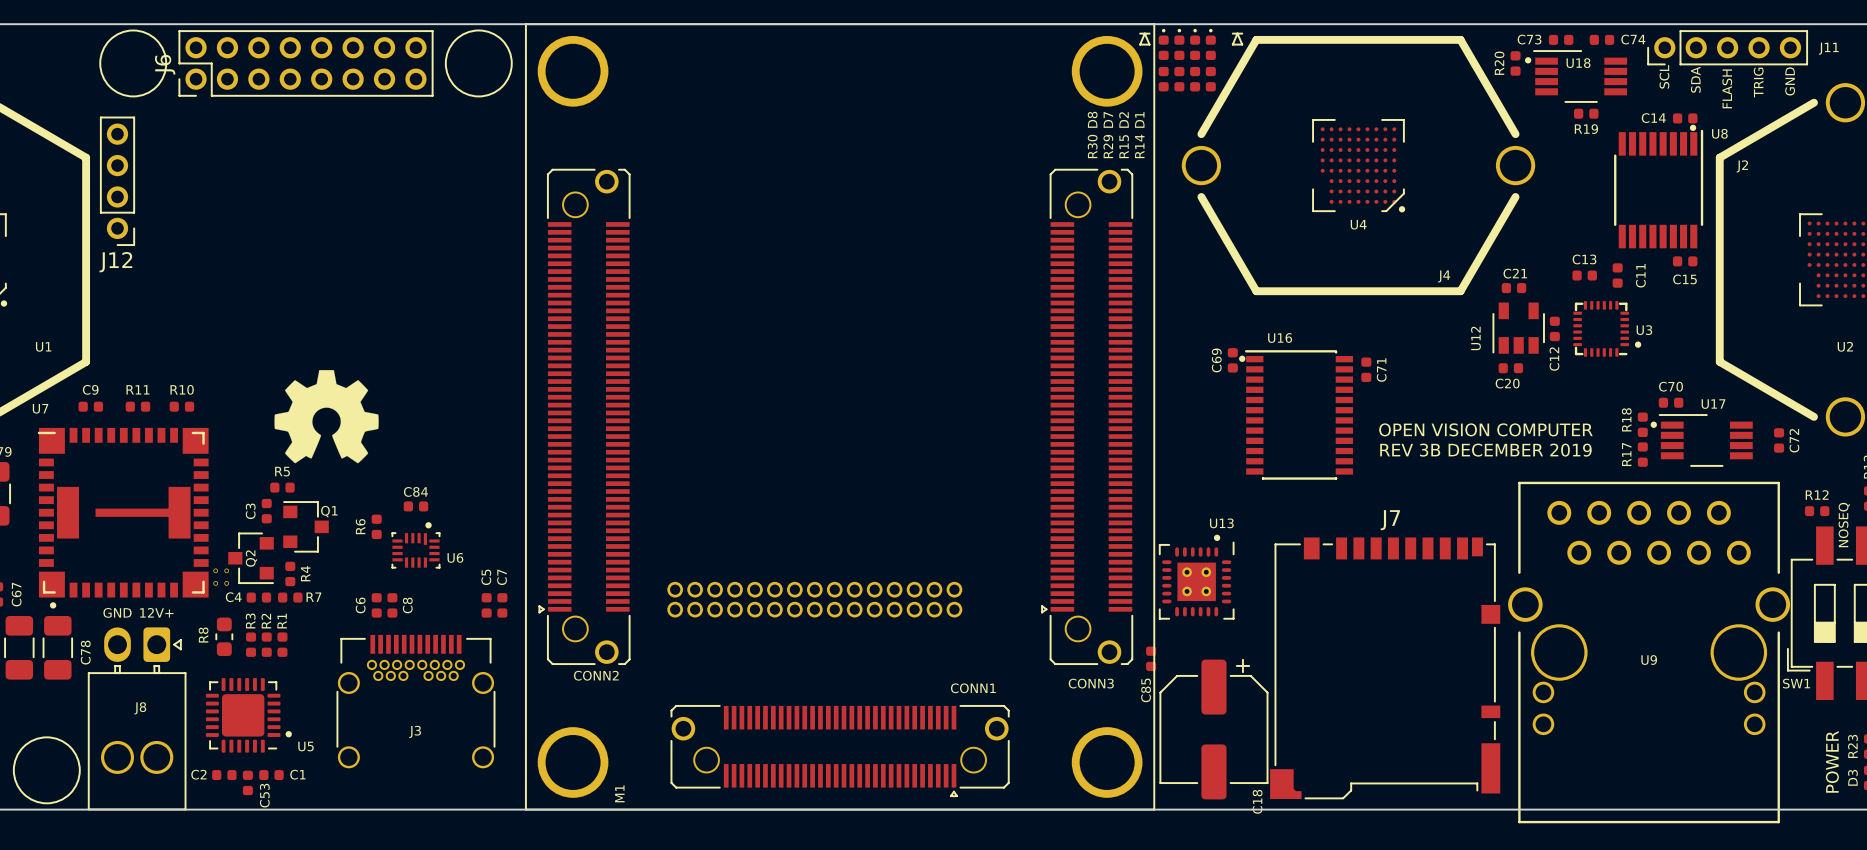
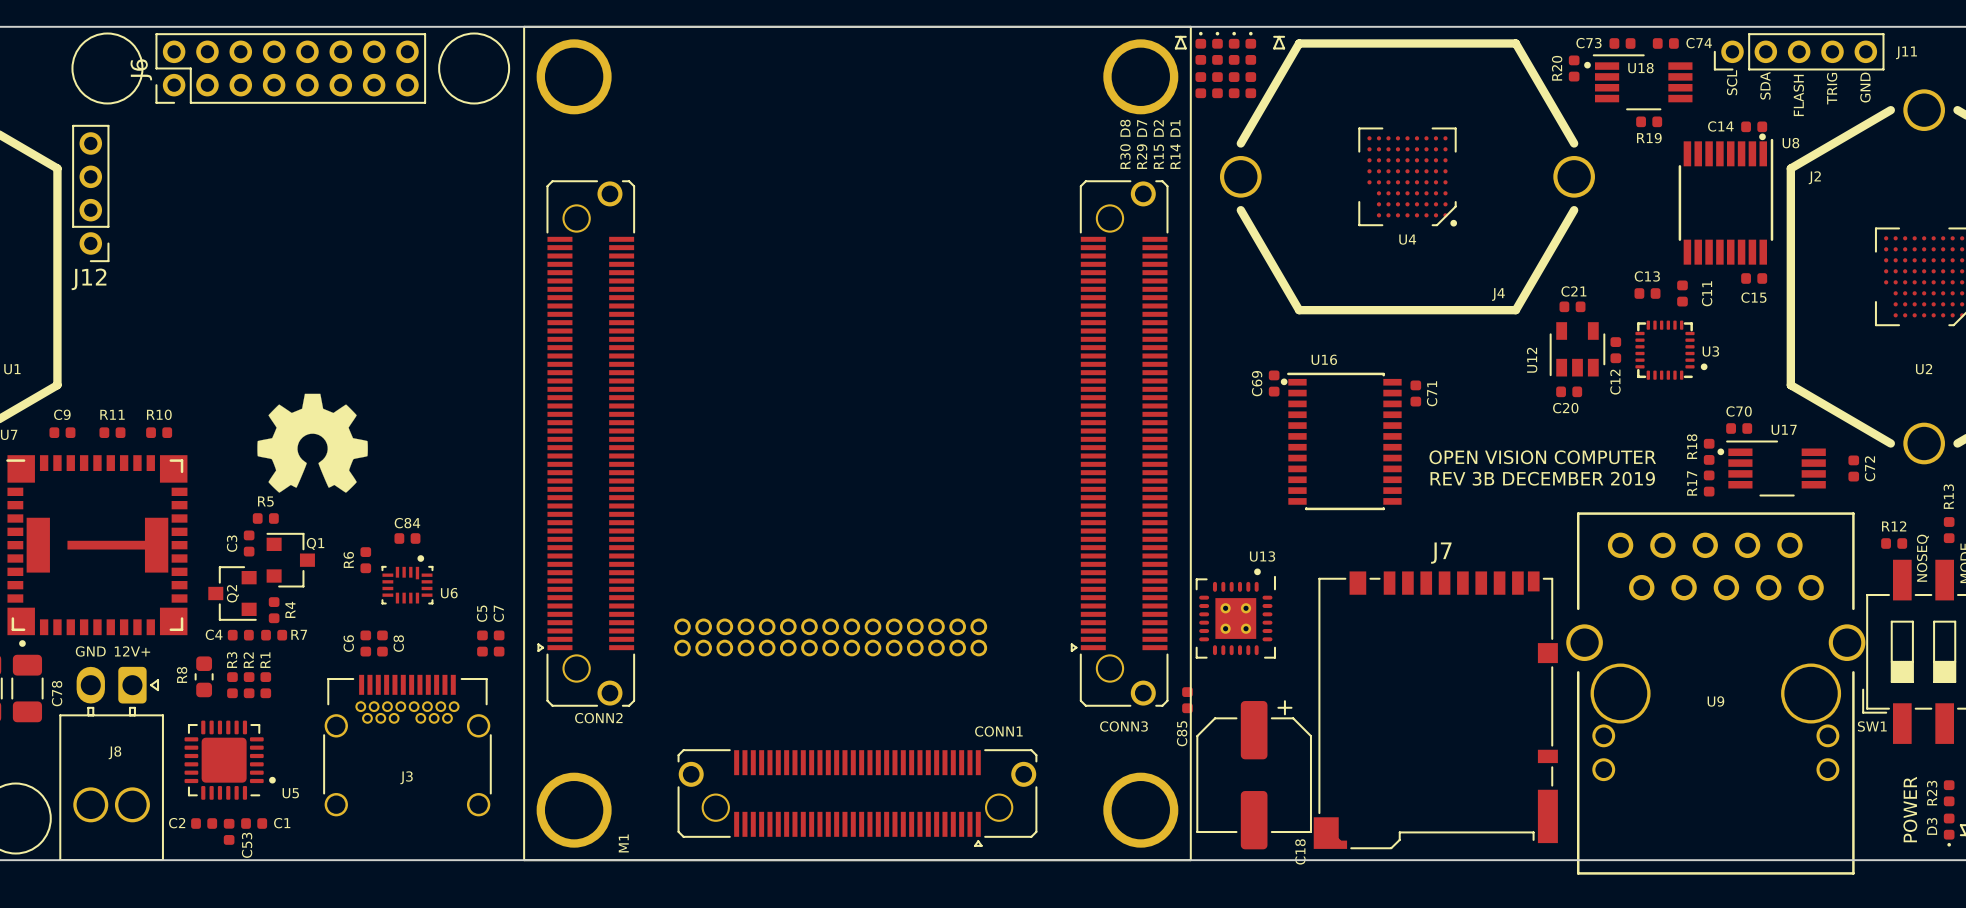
part: (221, 577) -> none

